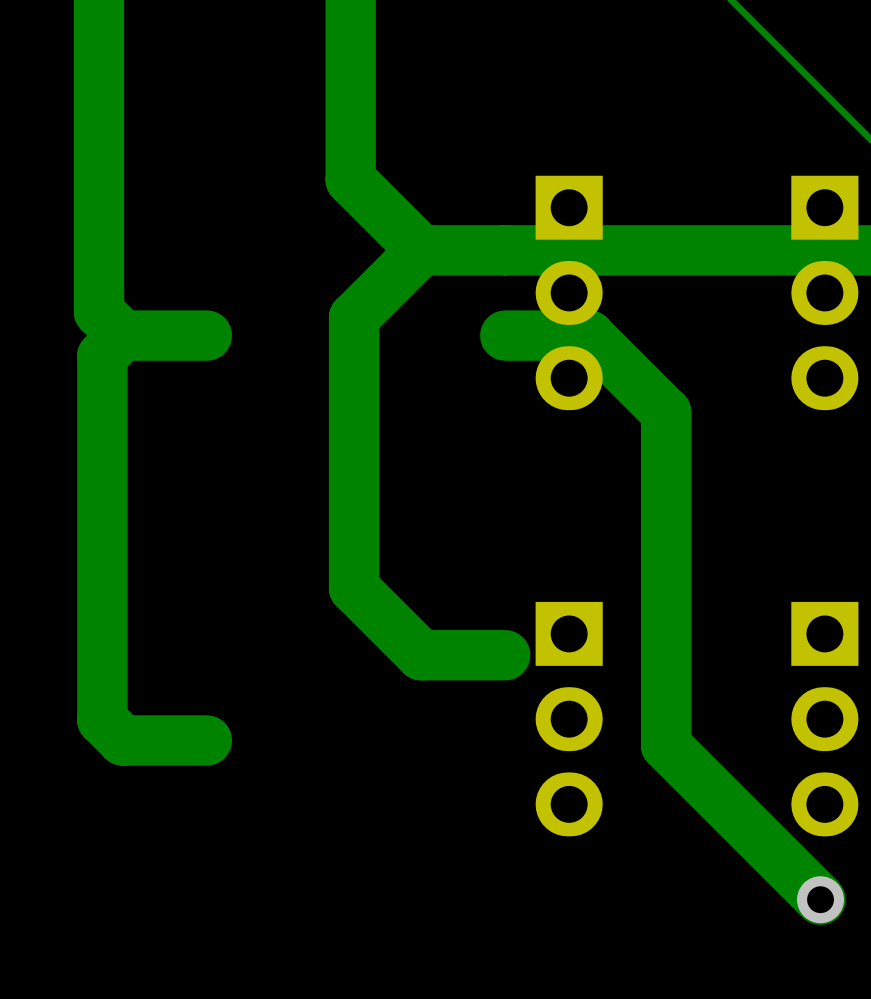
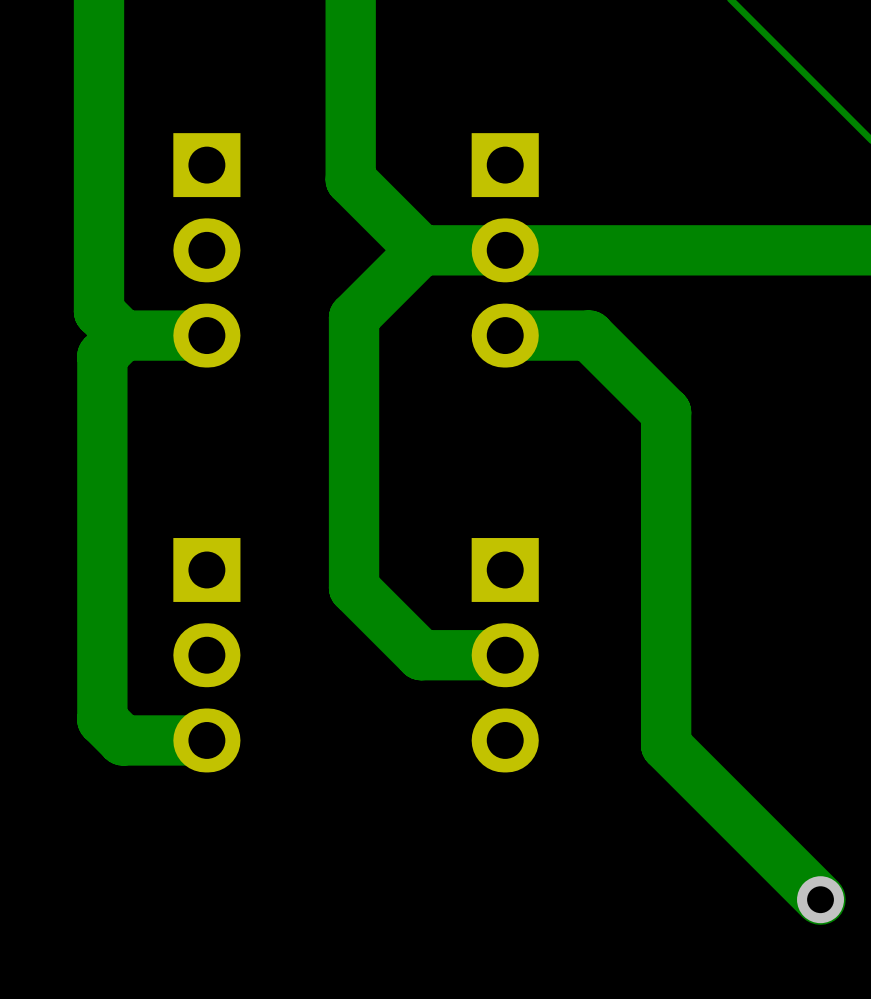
part: none -> (206, 250)
part position: (569, 292) -> (505, 250)
part: (824, 292) -> none
part: none -> (206, 655)
part position: (569, 719) -> (505, 655)
part: (824, 719) -> none

